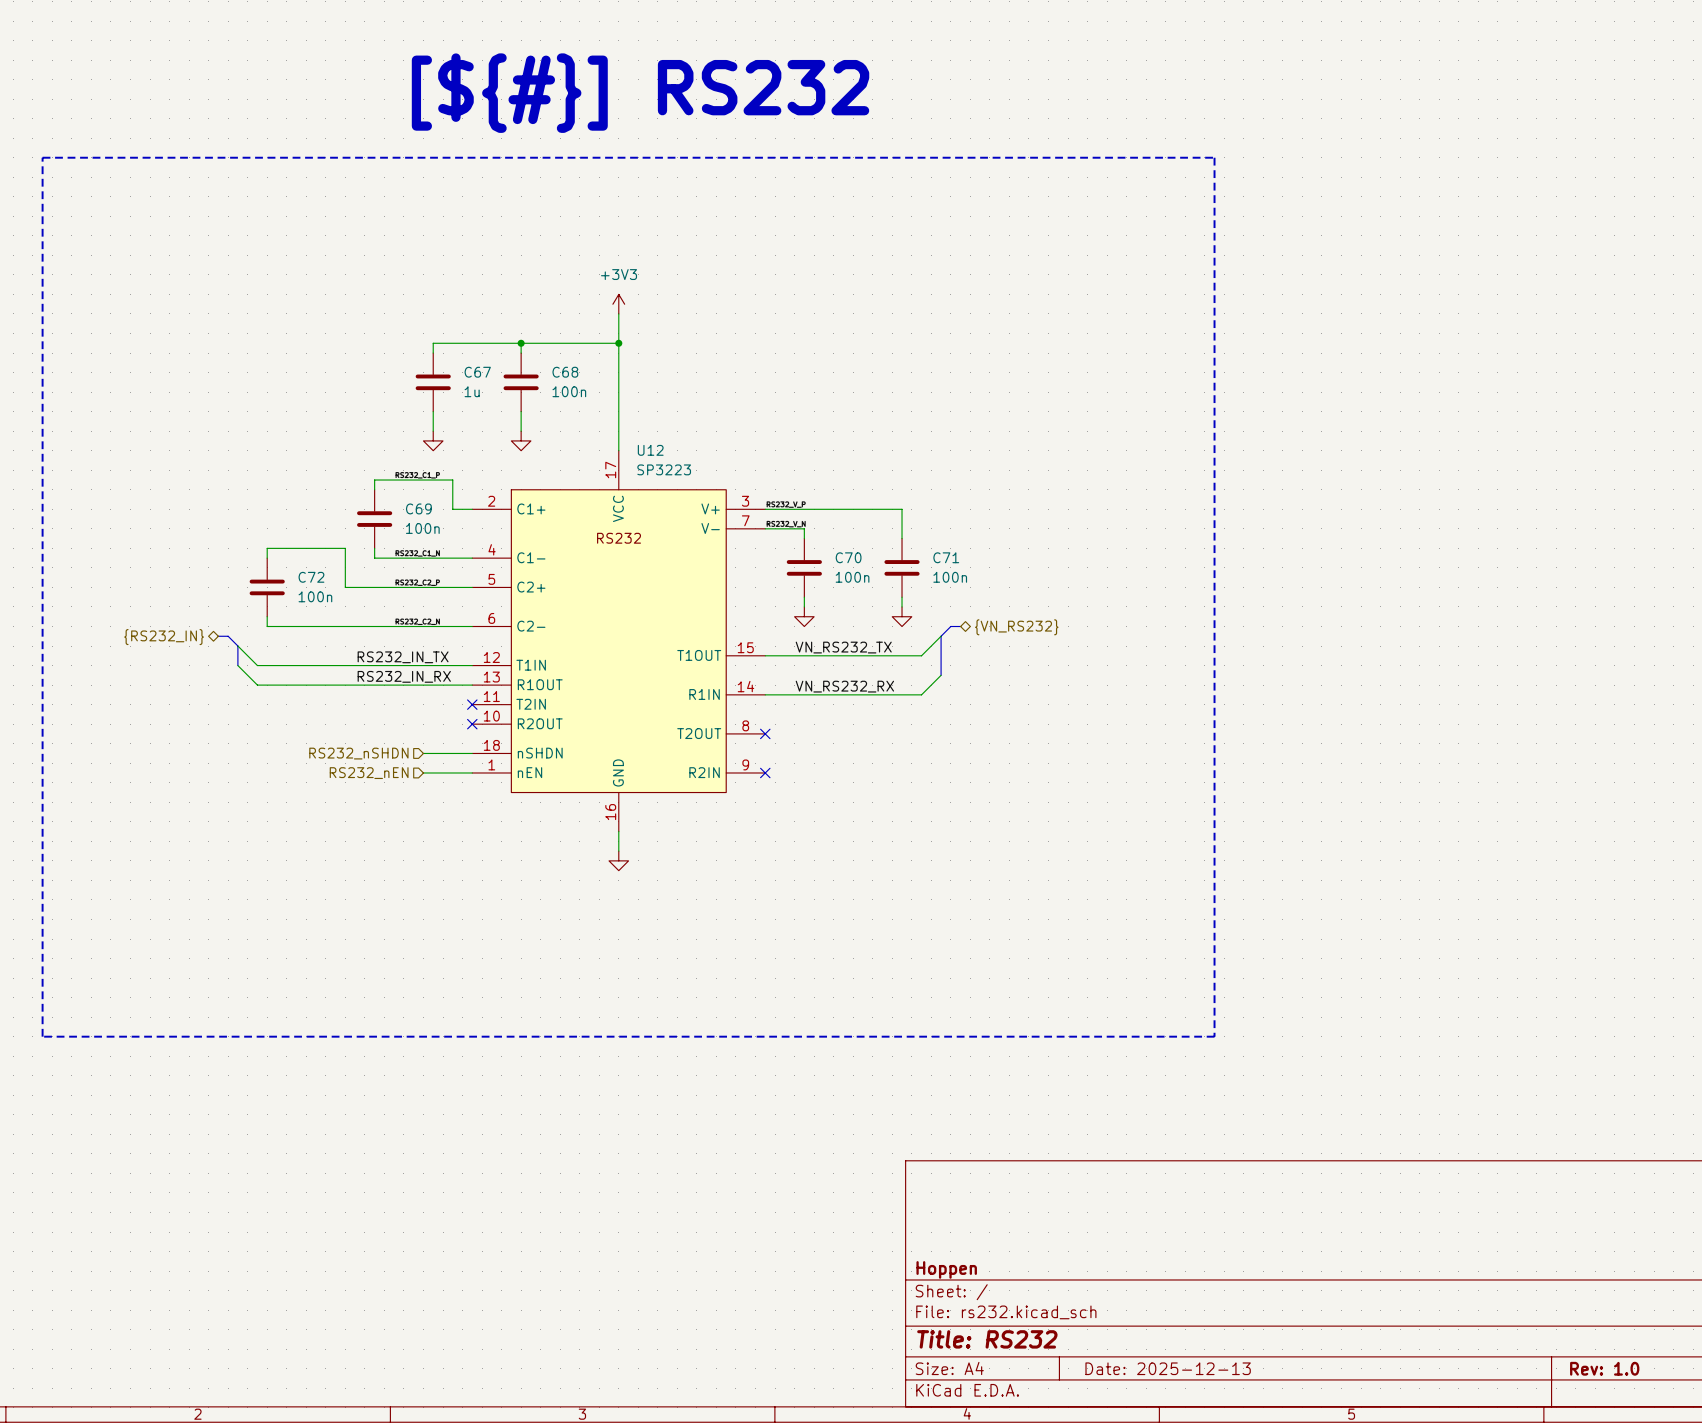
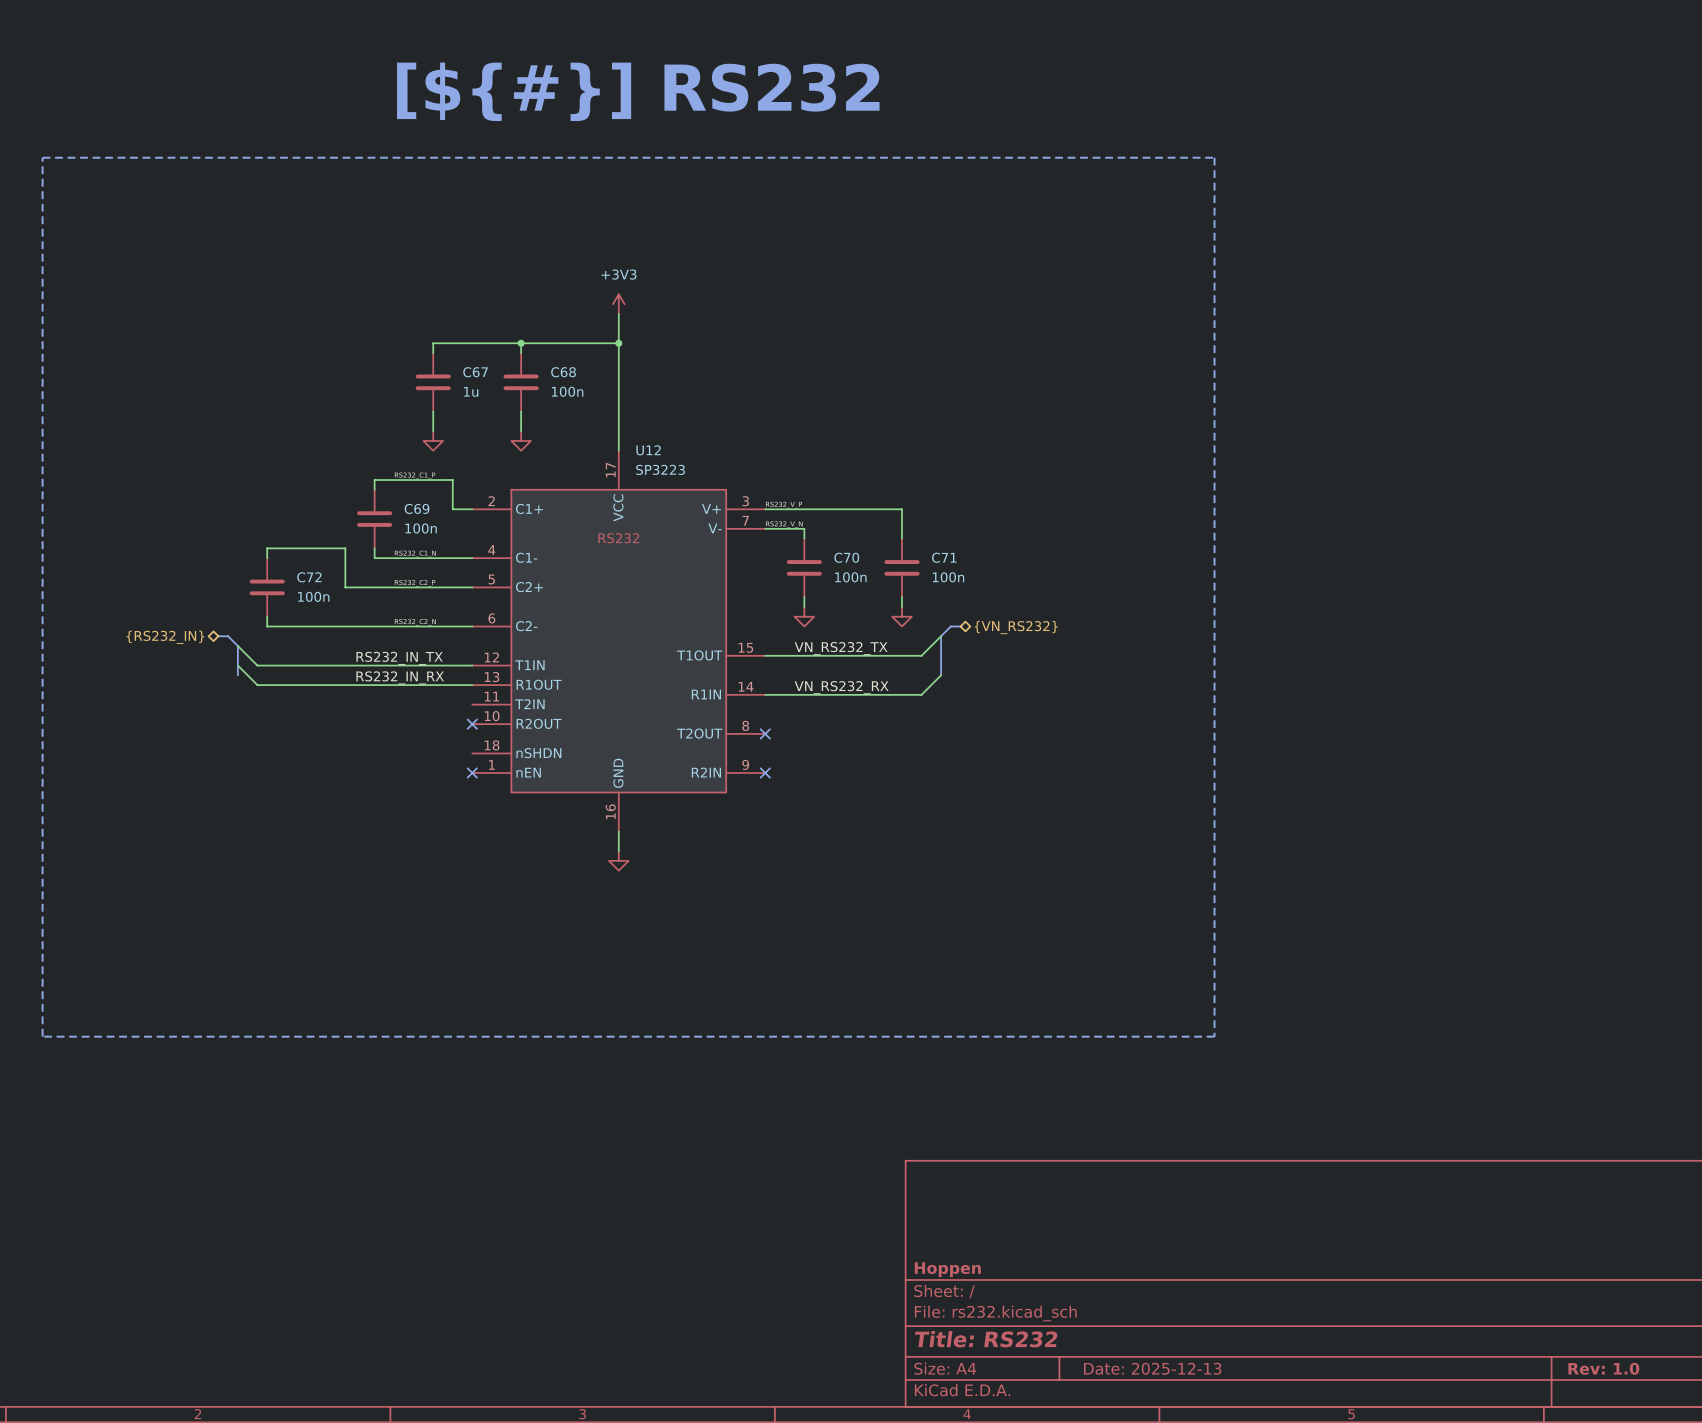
bus: none -> (237, 665) (237, 675)
no-connect mark: (472, 704) -> none
hierarchical label: RS232_nSHDN (358, 753) -> none
wire: (423, 753) (472, 753) -> none
wire: (423, 772) (472, 772) -> none
no-connect mark: none -> (472, 772)
hierarchical label: RS232_nEN (369, 773) -> none

